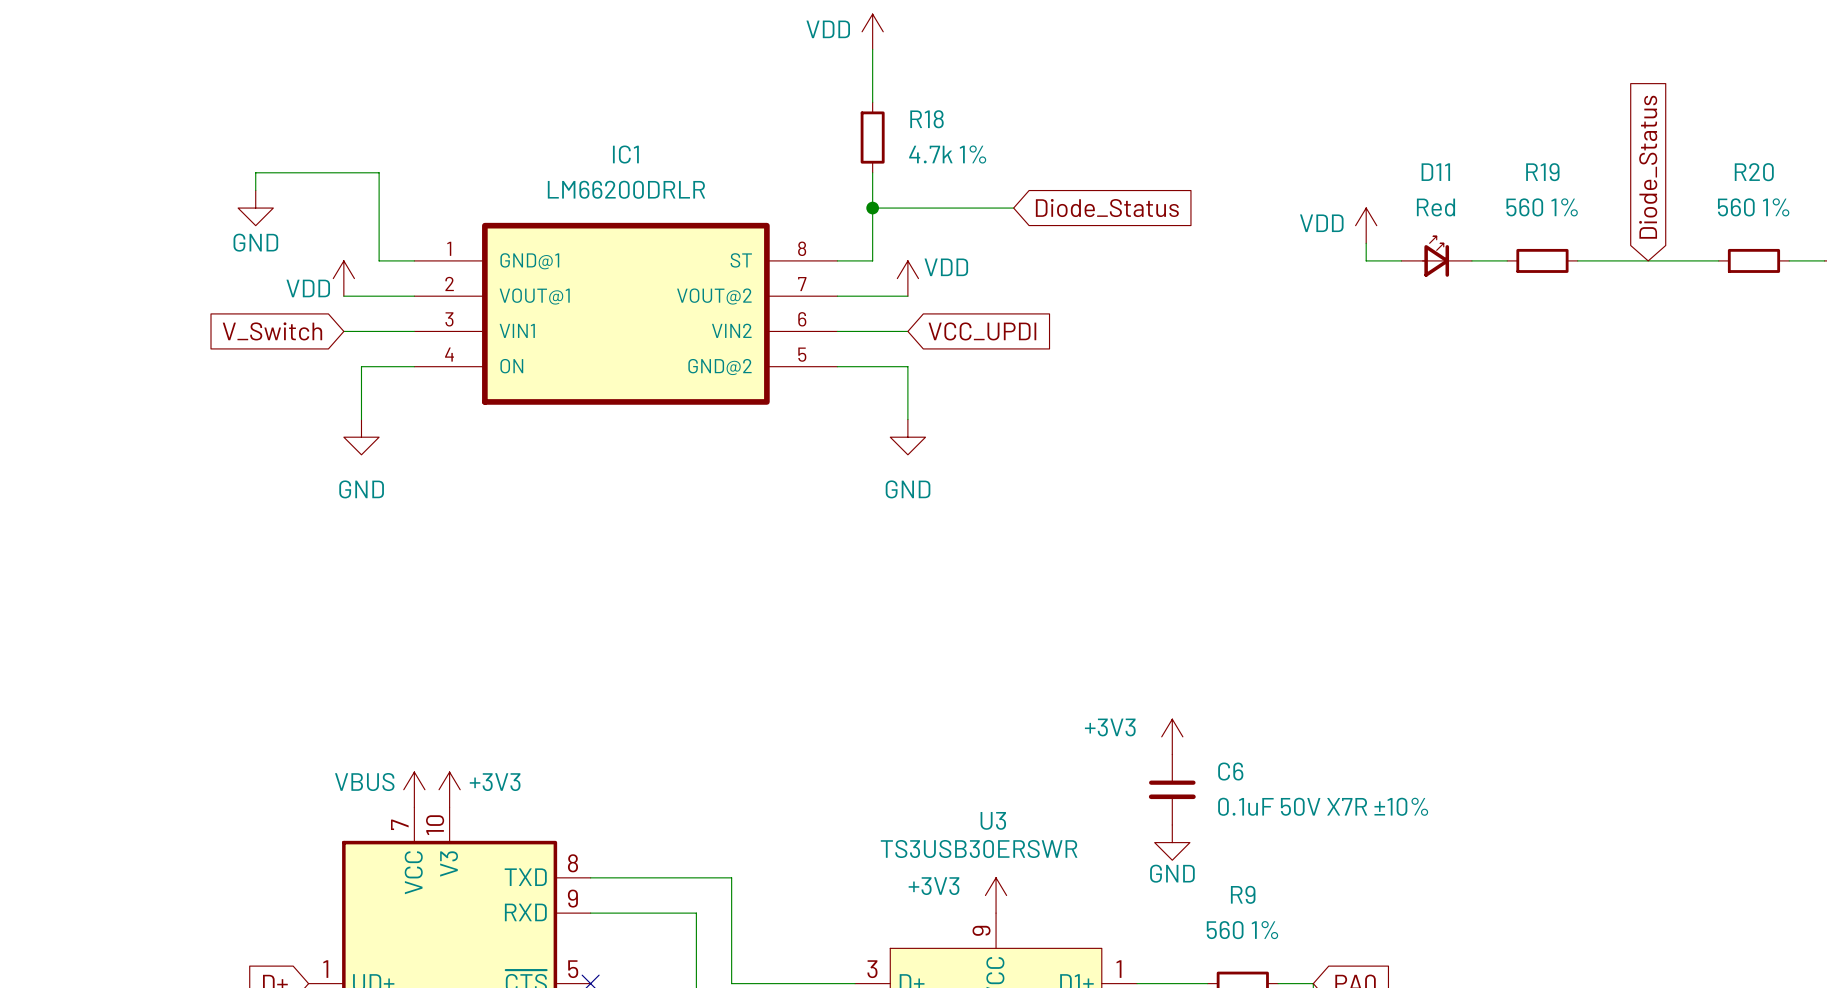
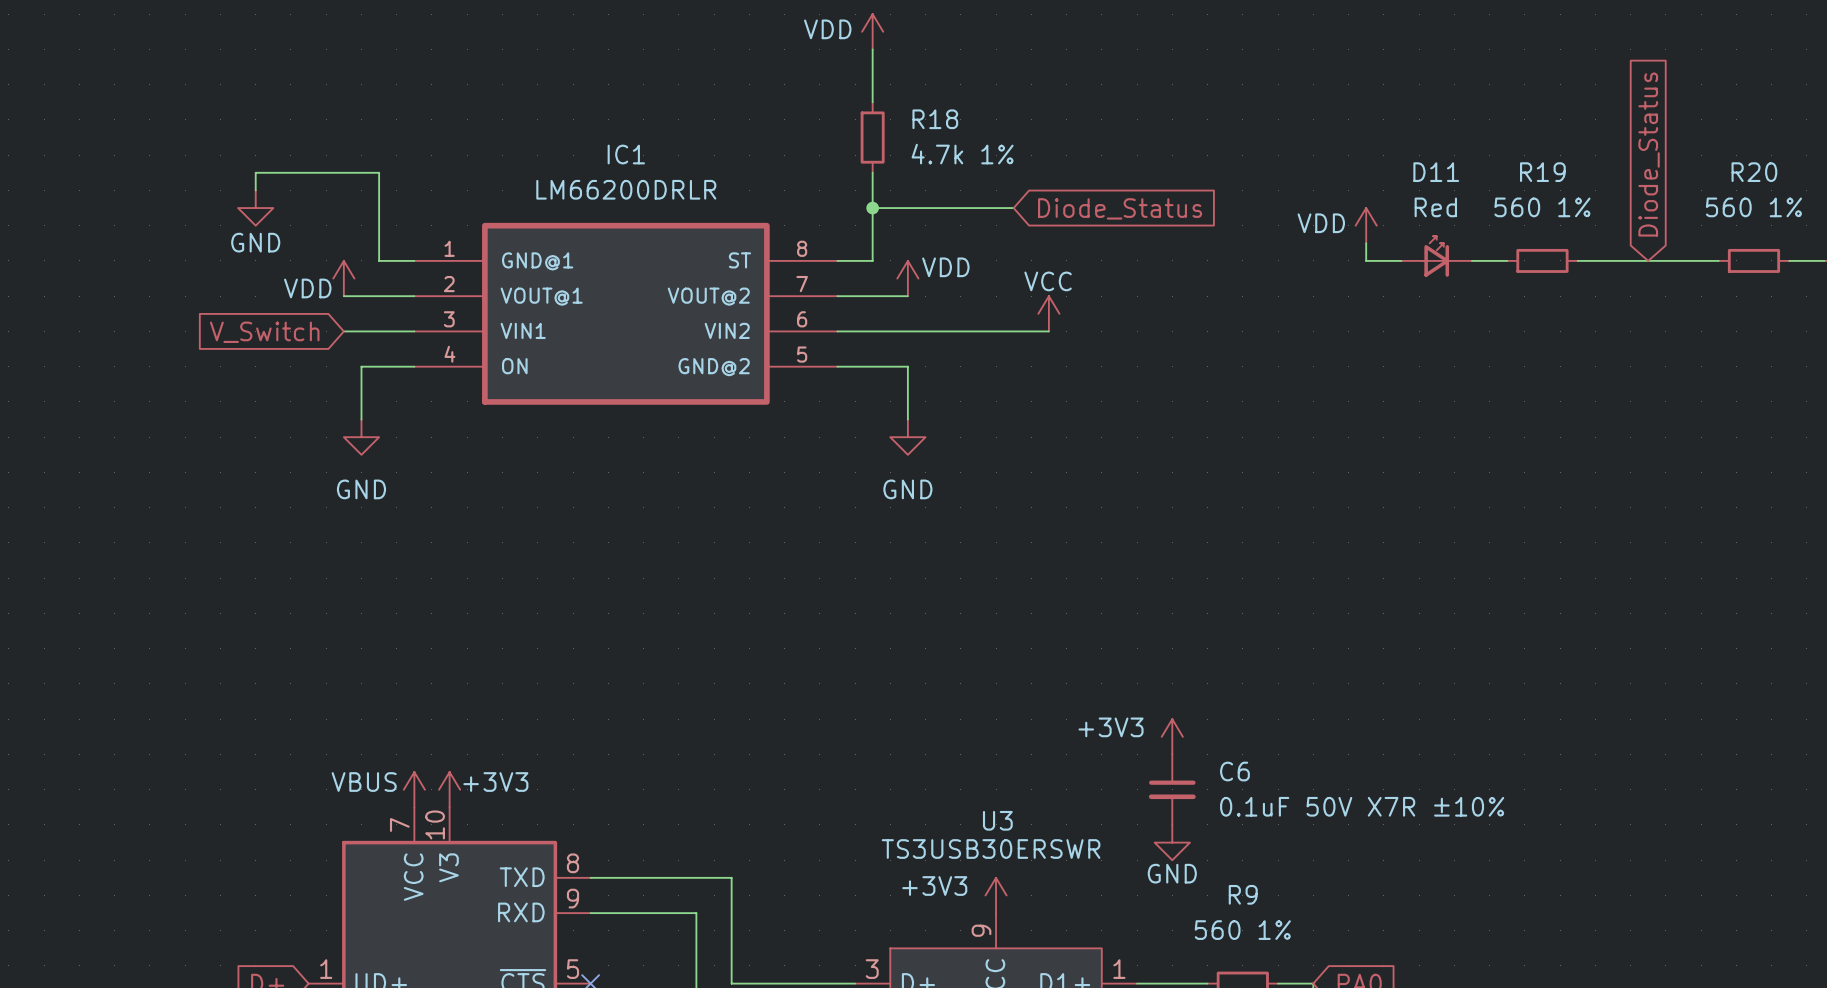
power symbol: none -> VCC (1048, 313)
wire: none -> (907, 331) (1048, 331)
global label: VCC_UPDI (982, 331) -> none

